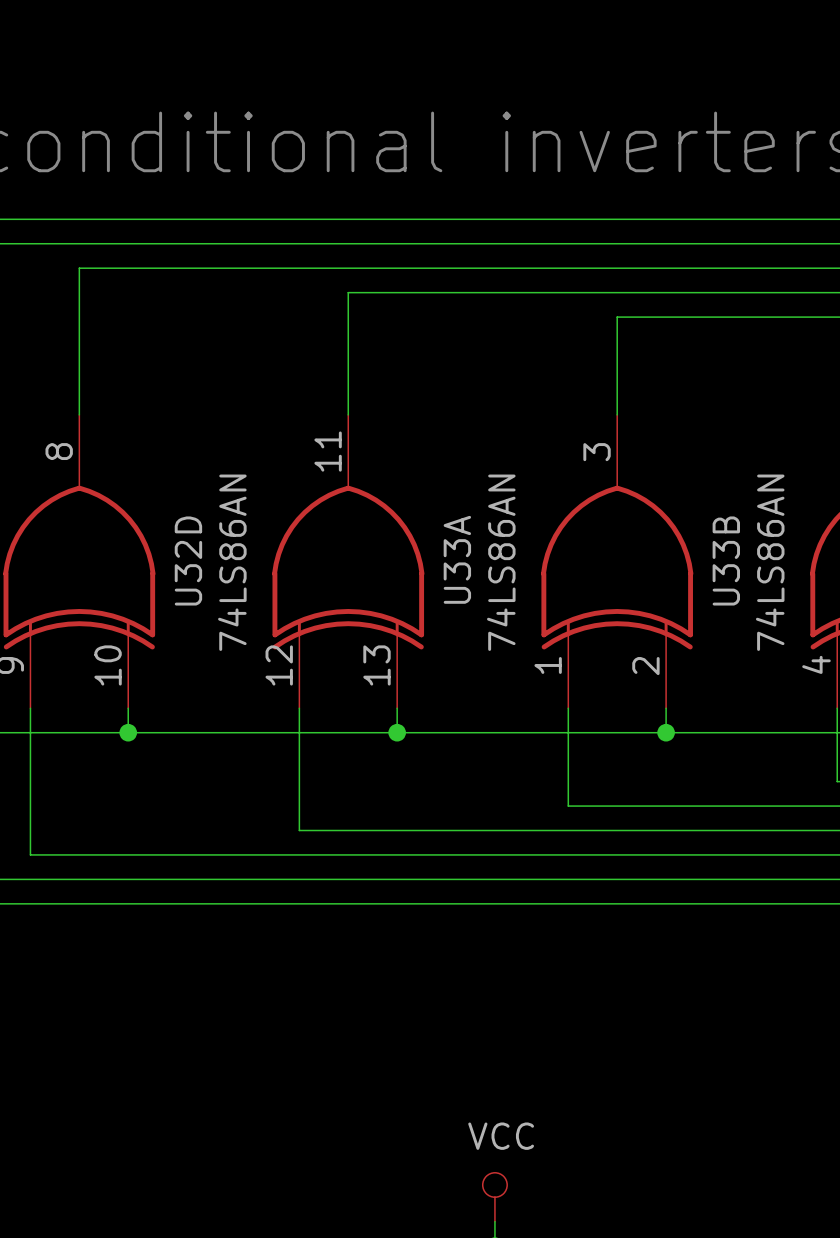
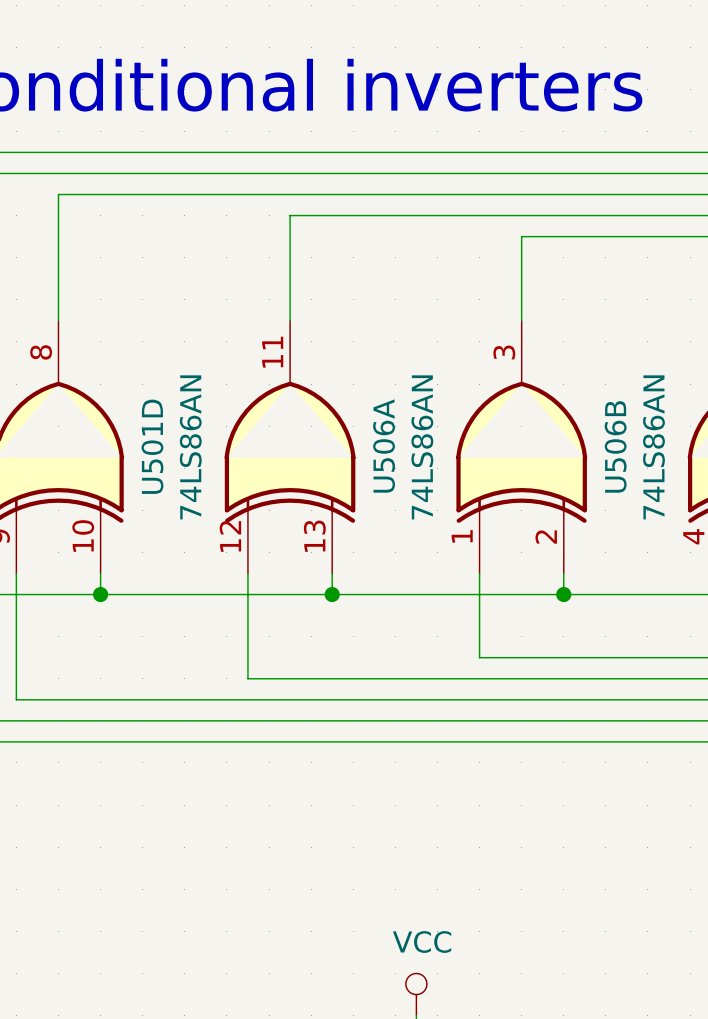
U33A name: U33A (457, 559) -> U506A (384, 446)
U32D name: U32D (188, 560) -> U501D (152, 446)
U33B name: U33B (726, 560) -> U506B (615, 446)

